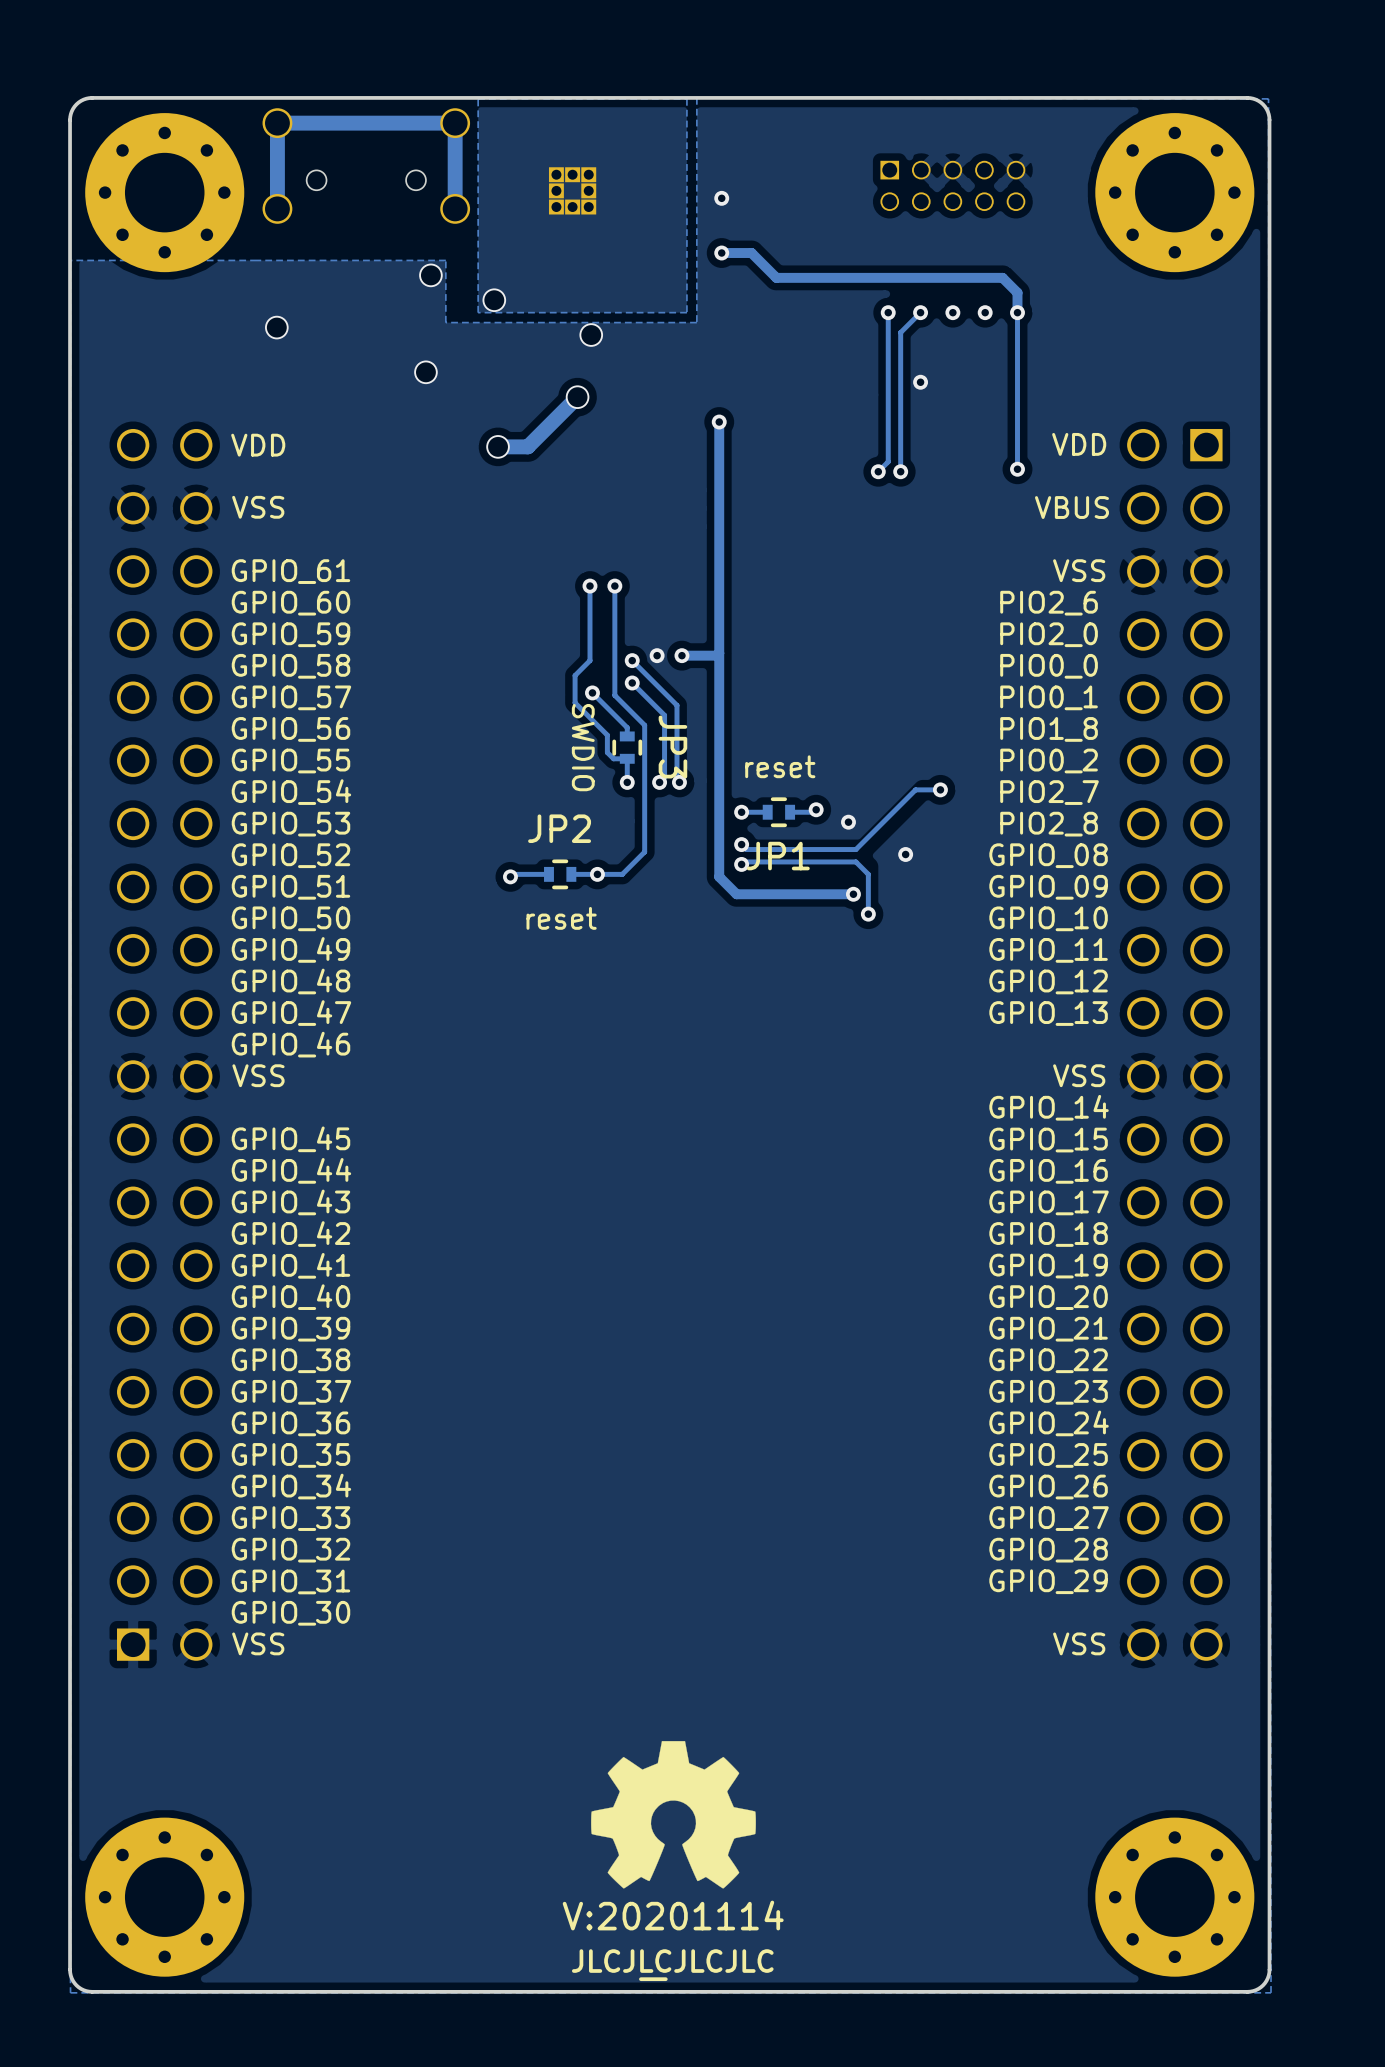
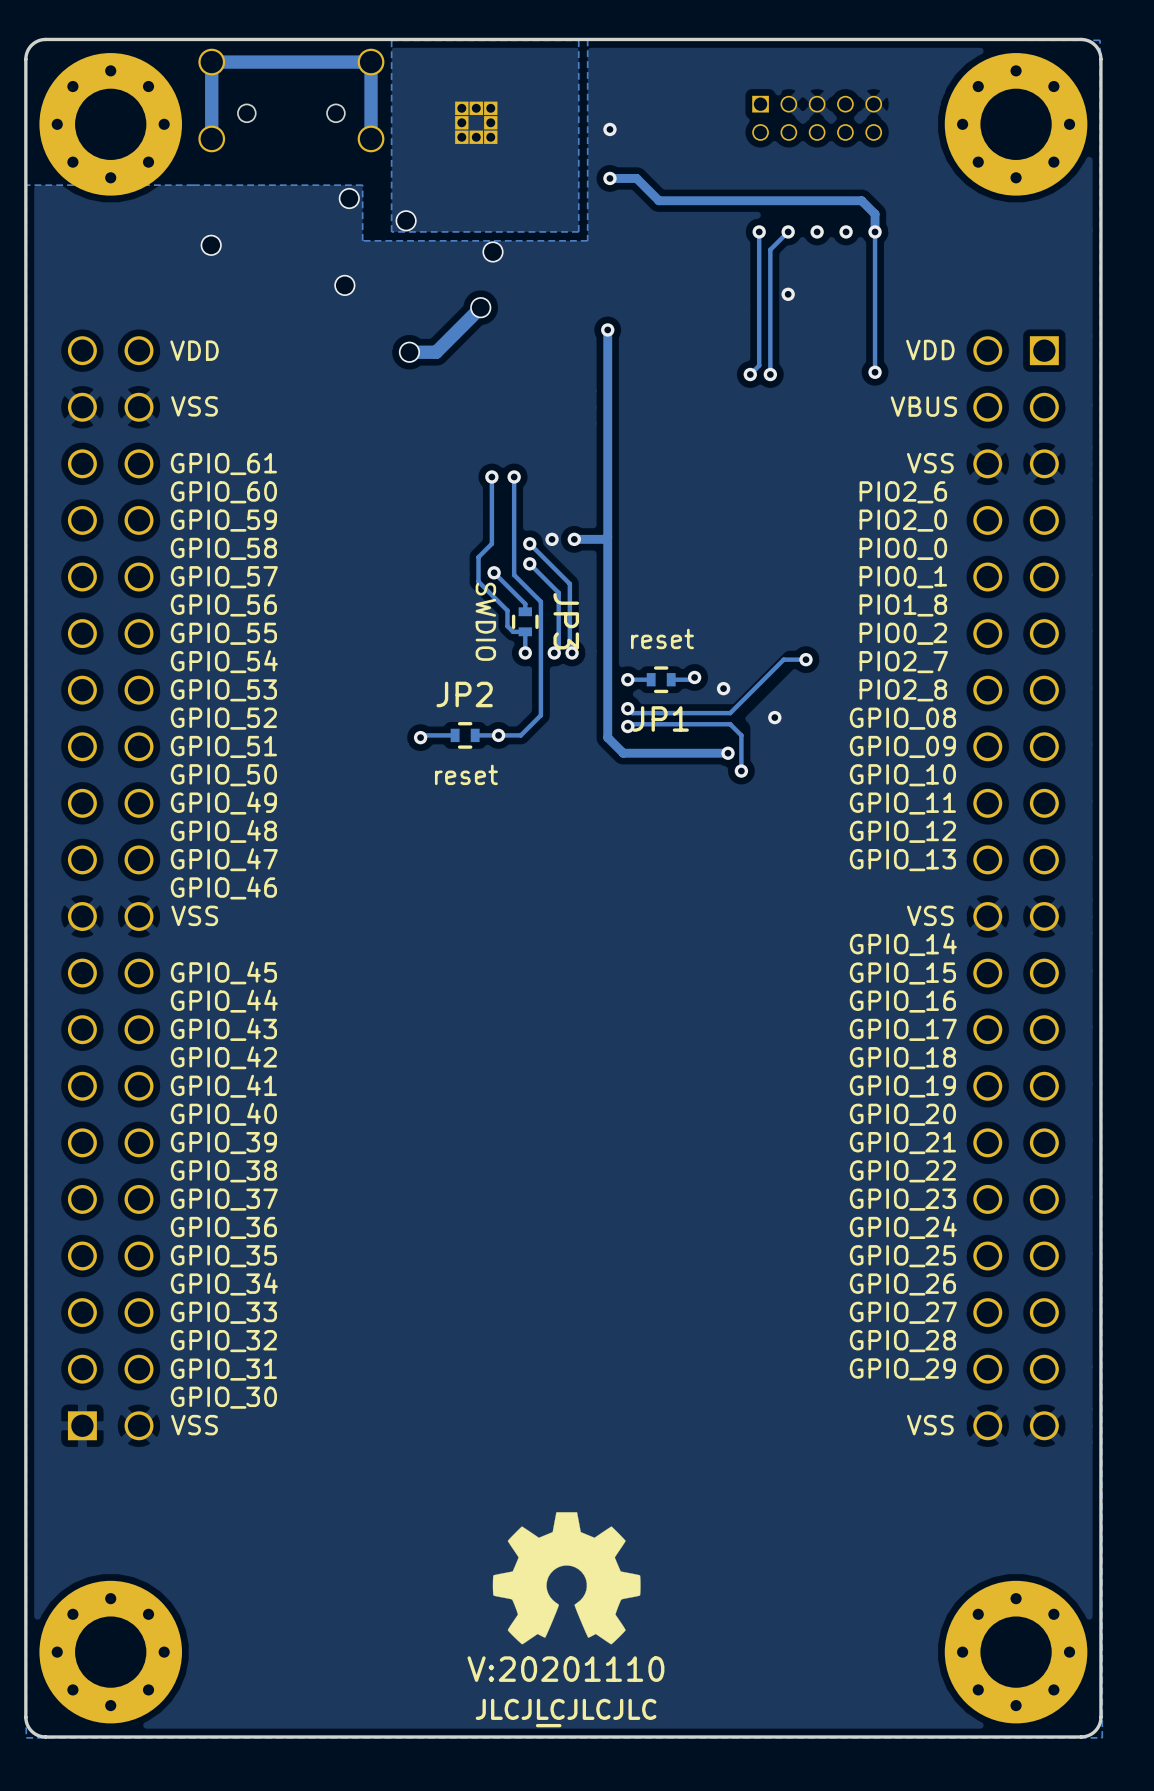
drawing shape: [562, 1900, 784, 1931] -> [467, 1656, 665, 1682]

